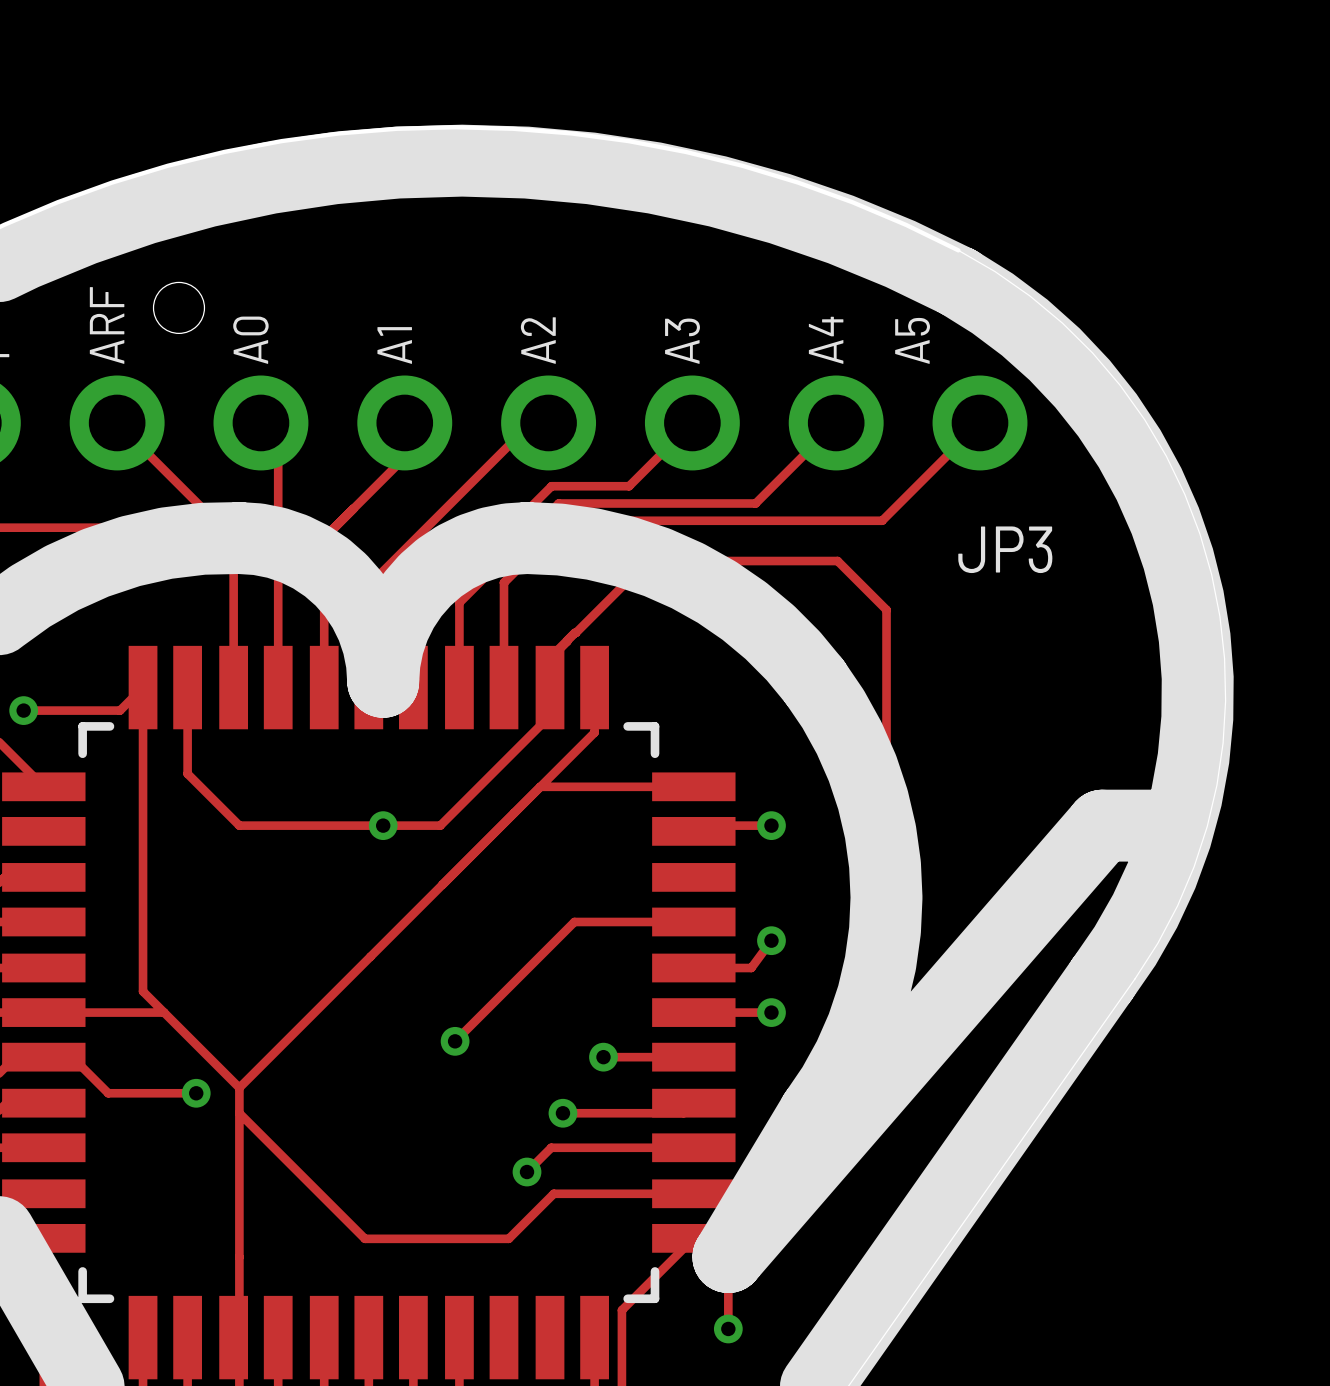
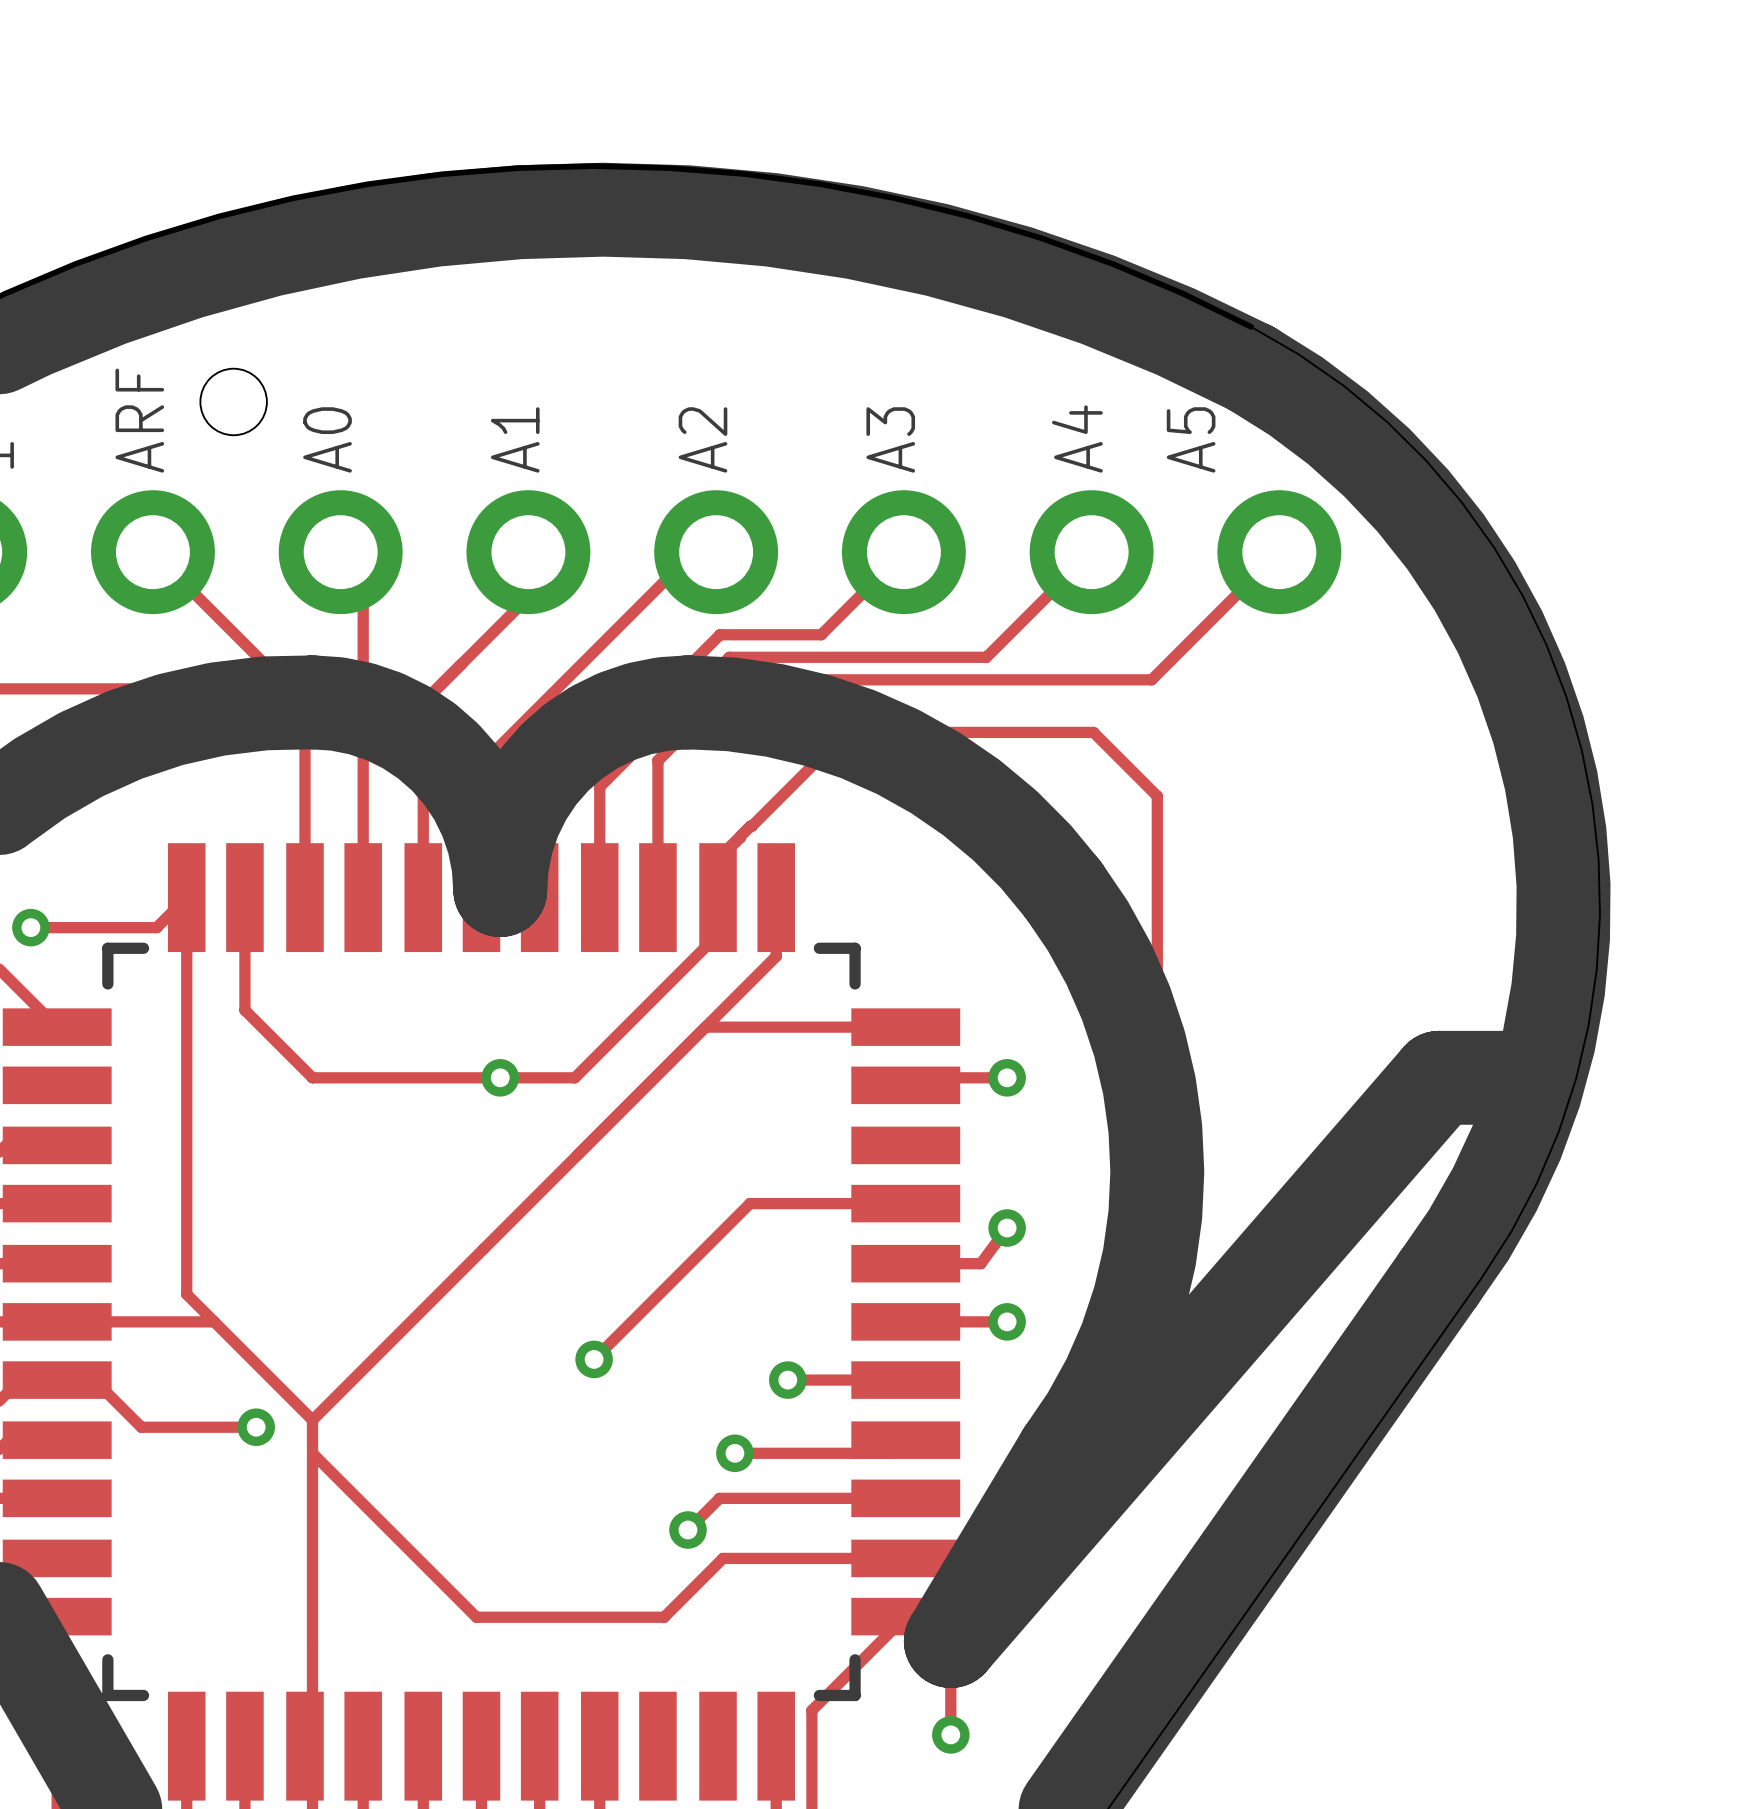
JP3 name: JP3 (1005, 549) -> none

